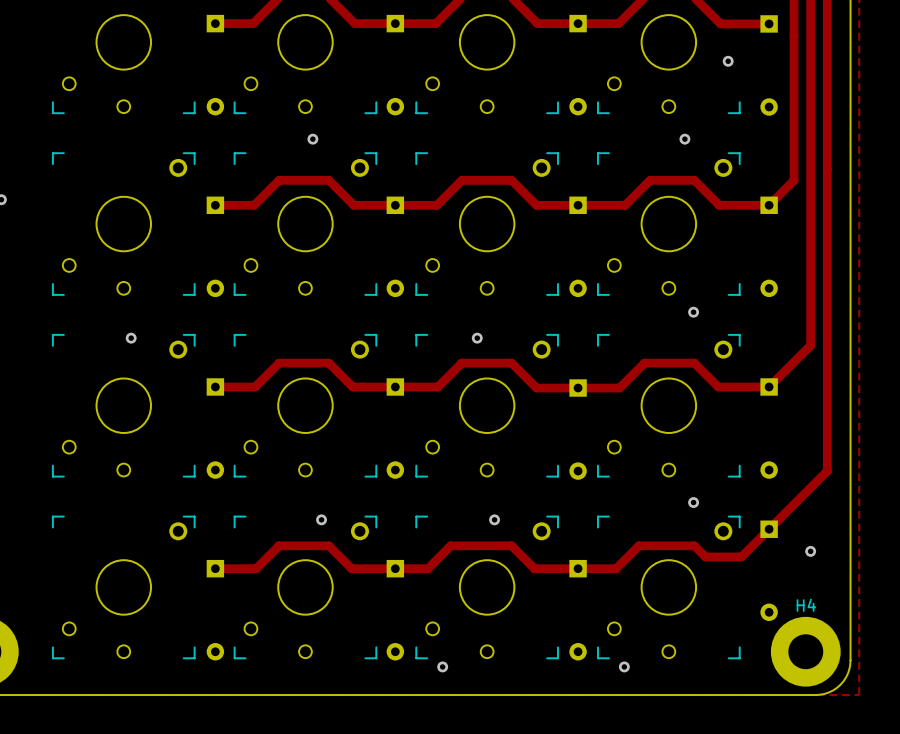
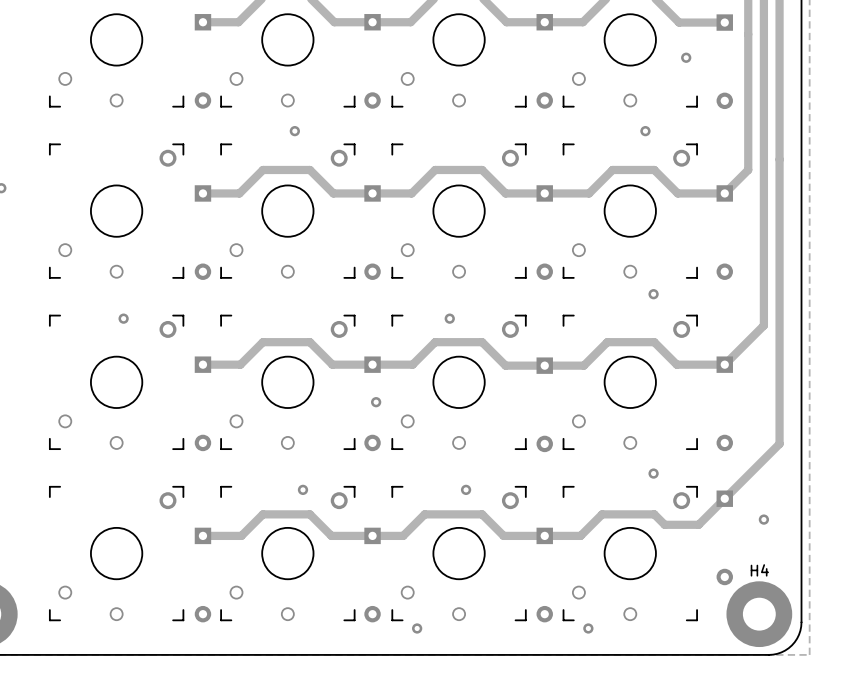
via: none -> (376, 402)

